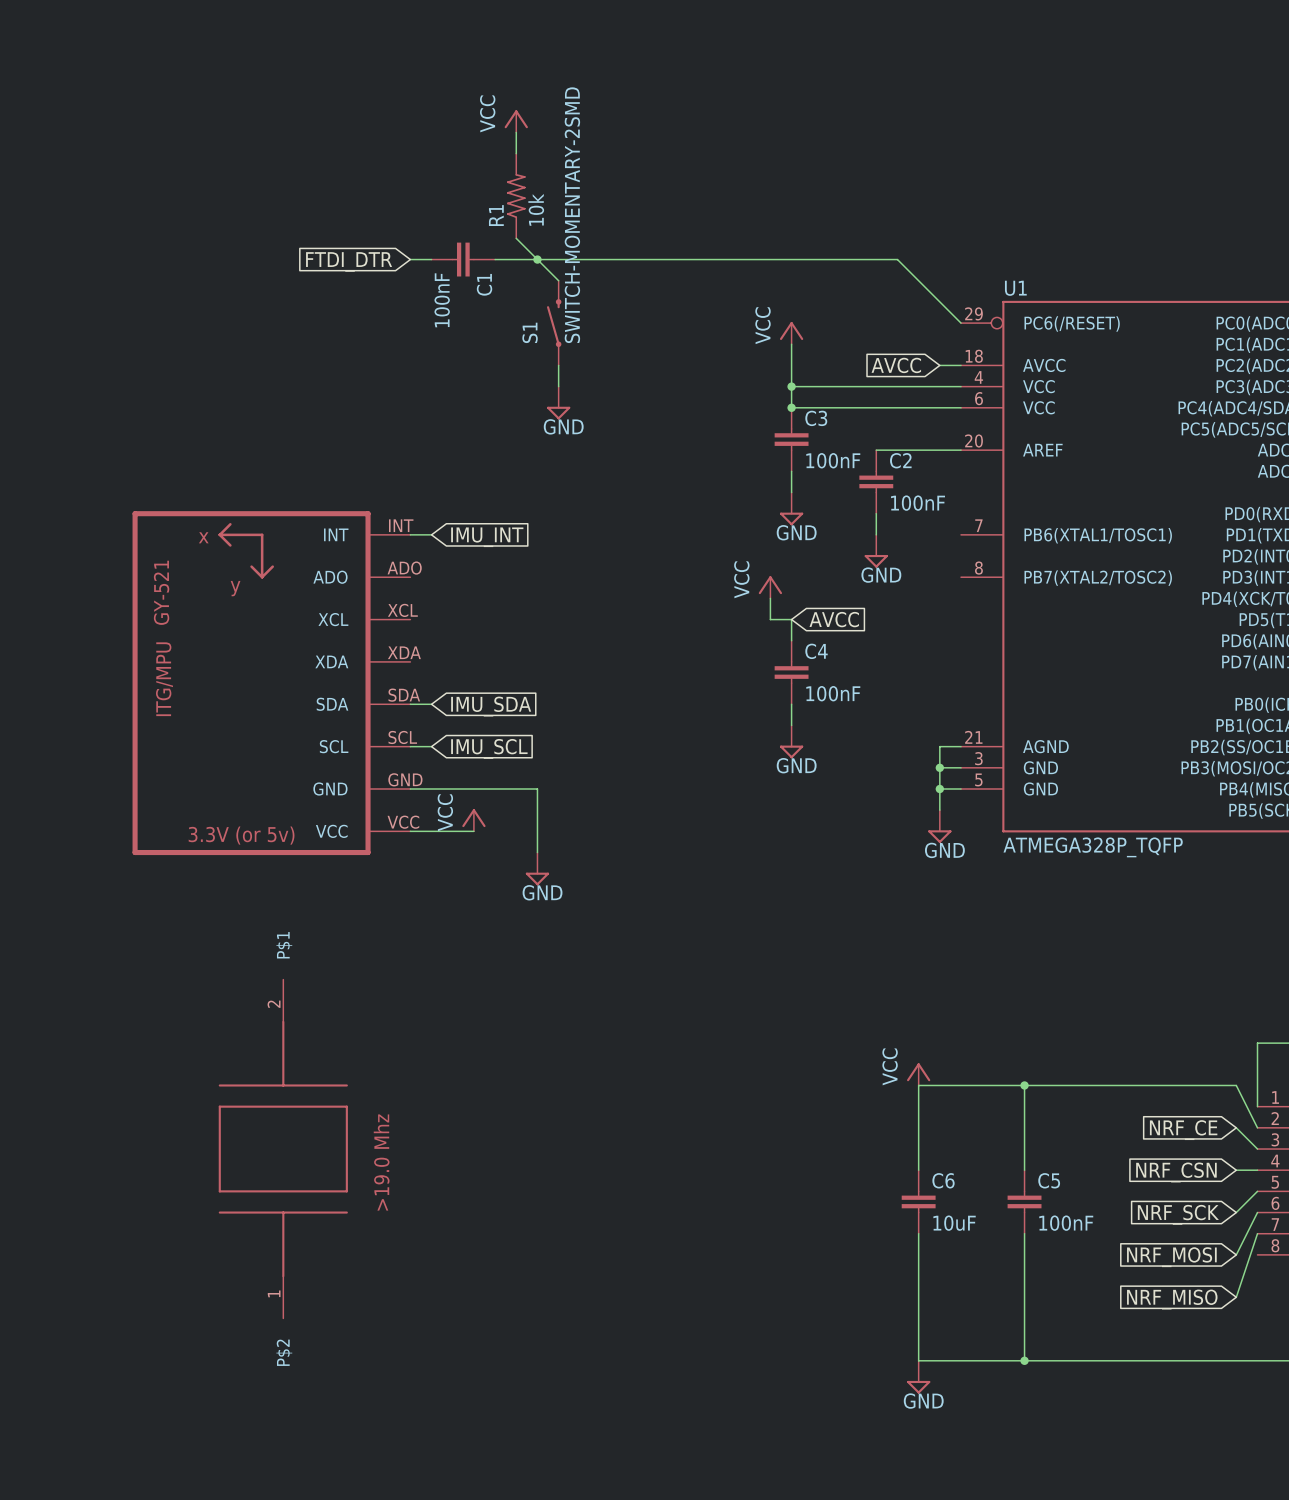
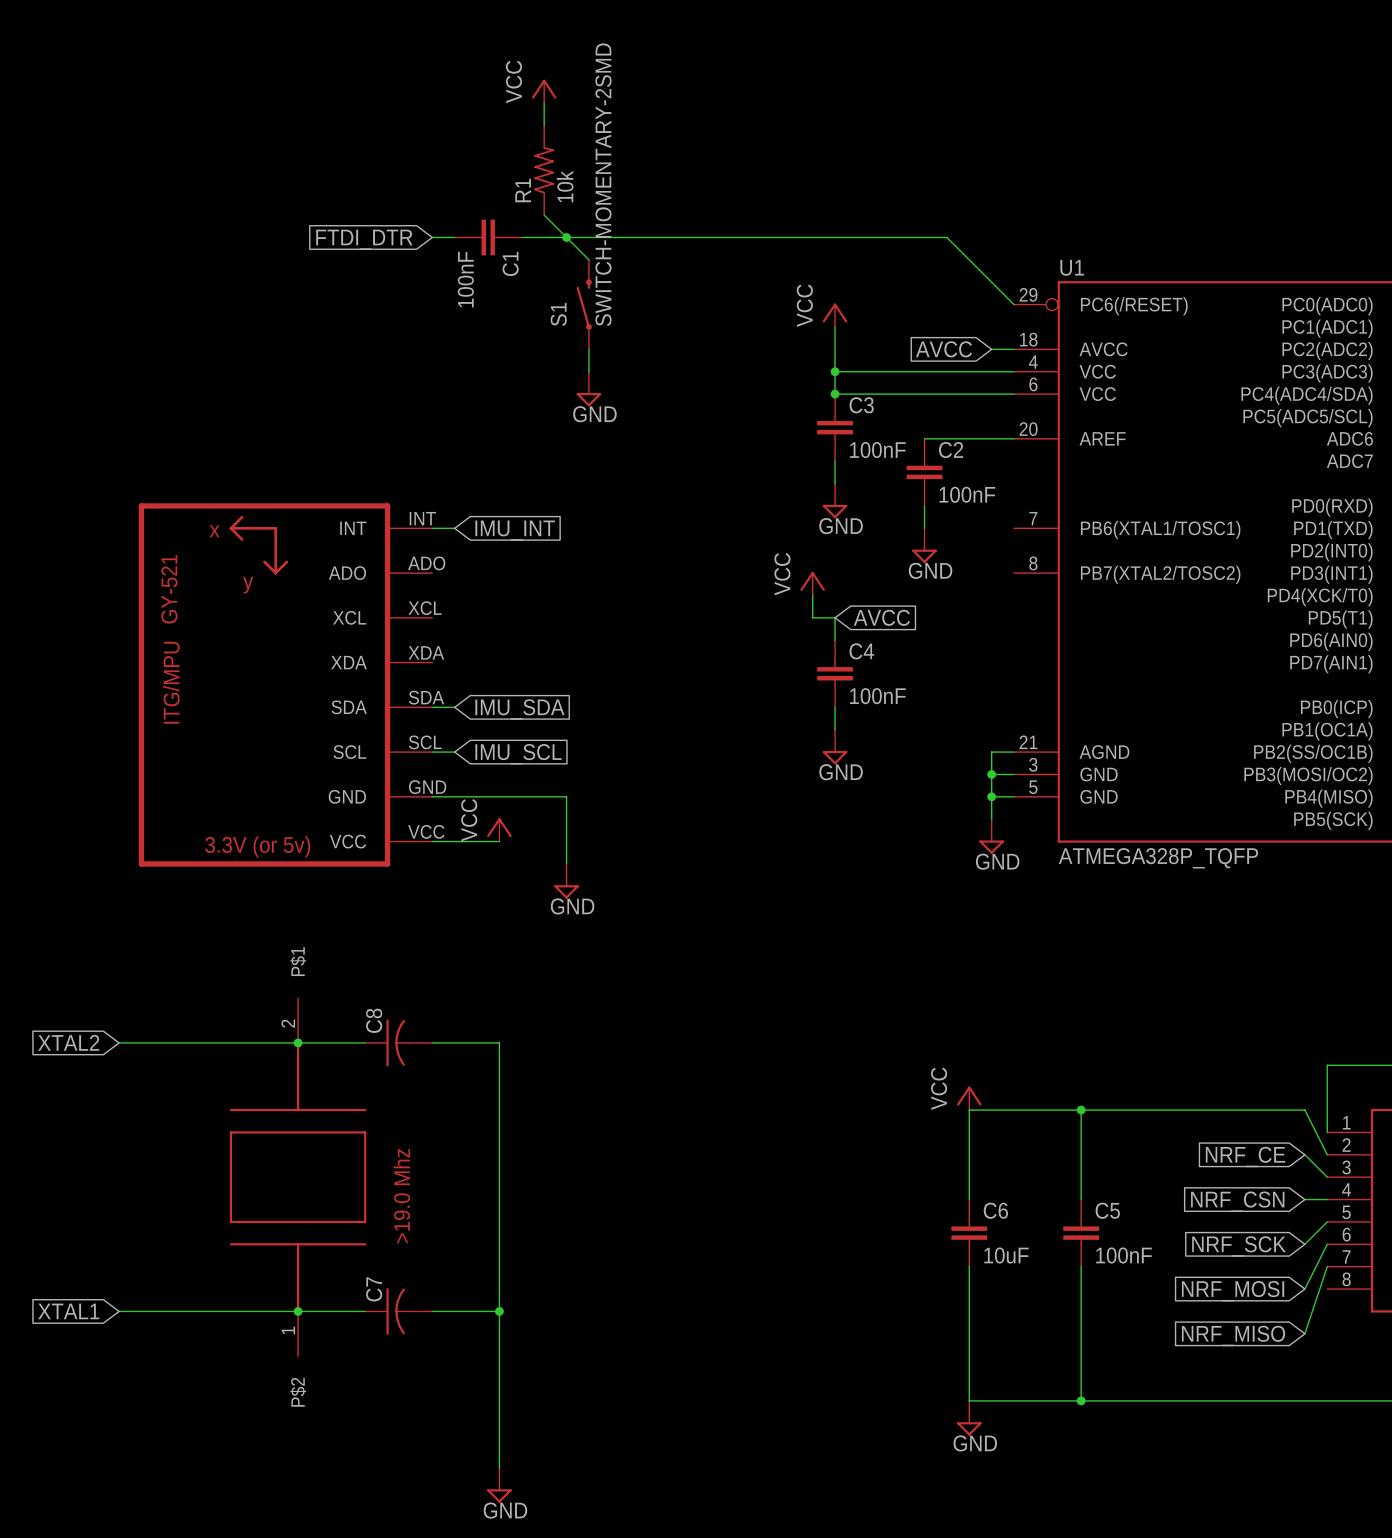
global label: none -> XTAL2 (68, 1042)
wire: none -> (119, 1042) (365, 1042)
junction: none -> (298, 1042)
C8: none -> (398, 1042)
wire: none -> (432, 1042) (499, 1042) (499, 1468)
global label: none -> XTAL1 (68, 1311)
wire: none -> (119, 1311) (365, 1311)
junction: none -> (298, 1311)
C7: none -> (398, 1311)
wire: none -> (432, 1311) (499, 1311)
junction: none -> (499, 1311)
power symbol: none -> GND (499, 1485)

